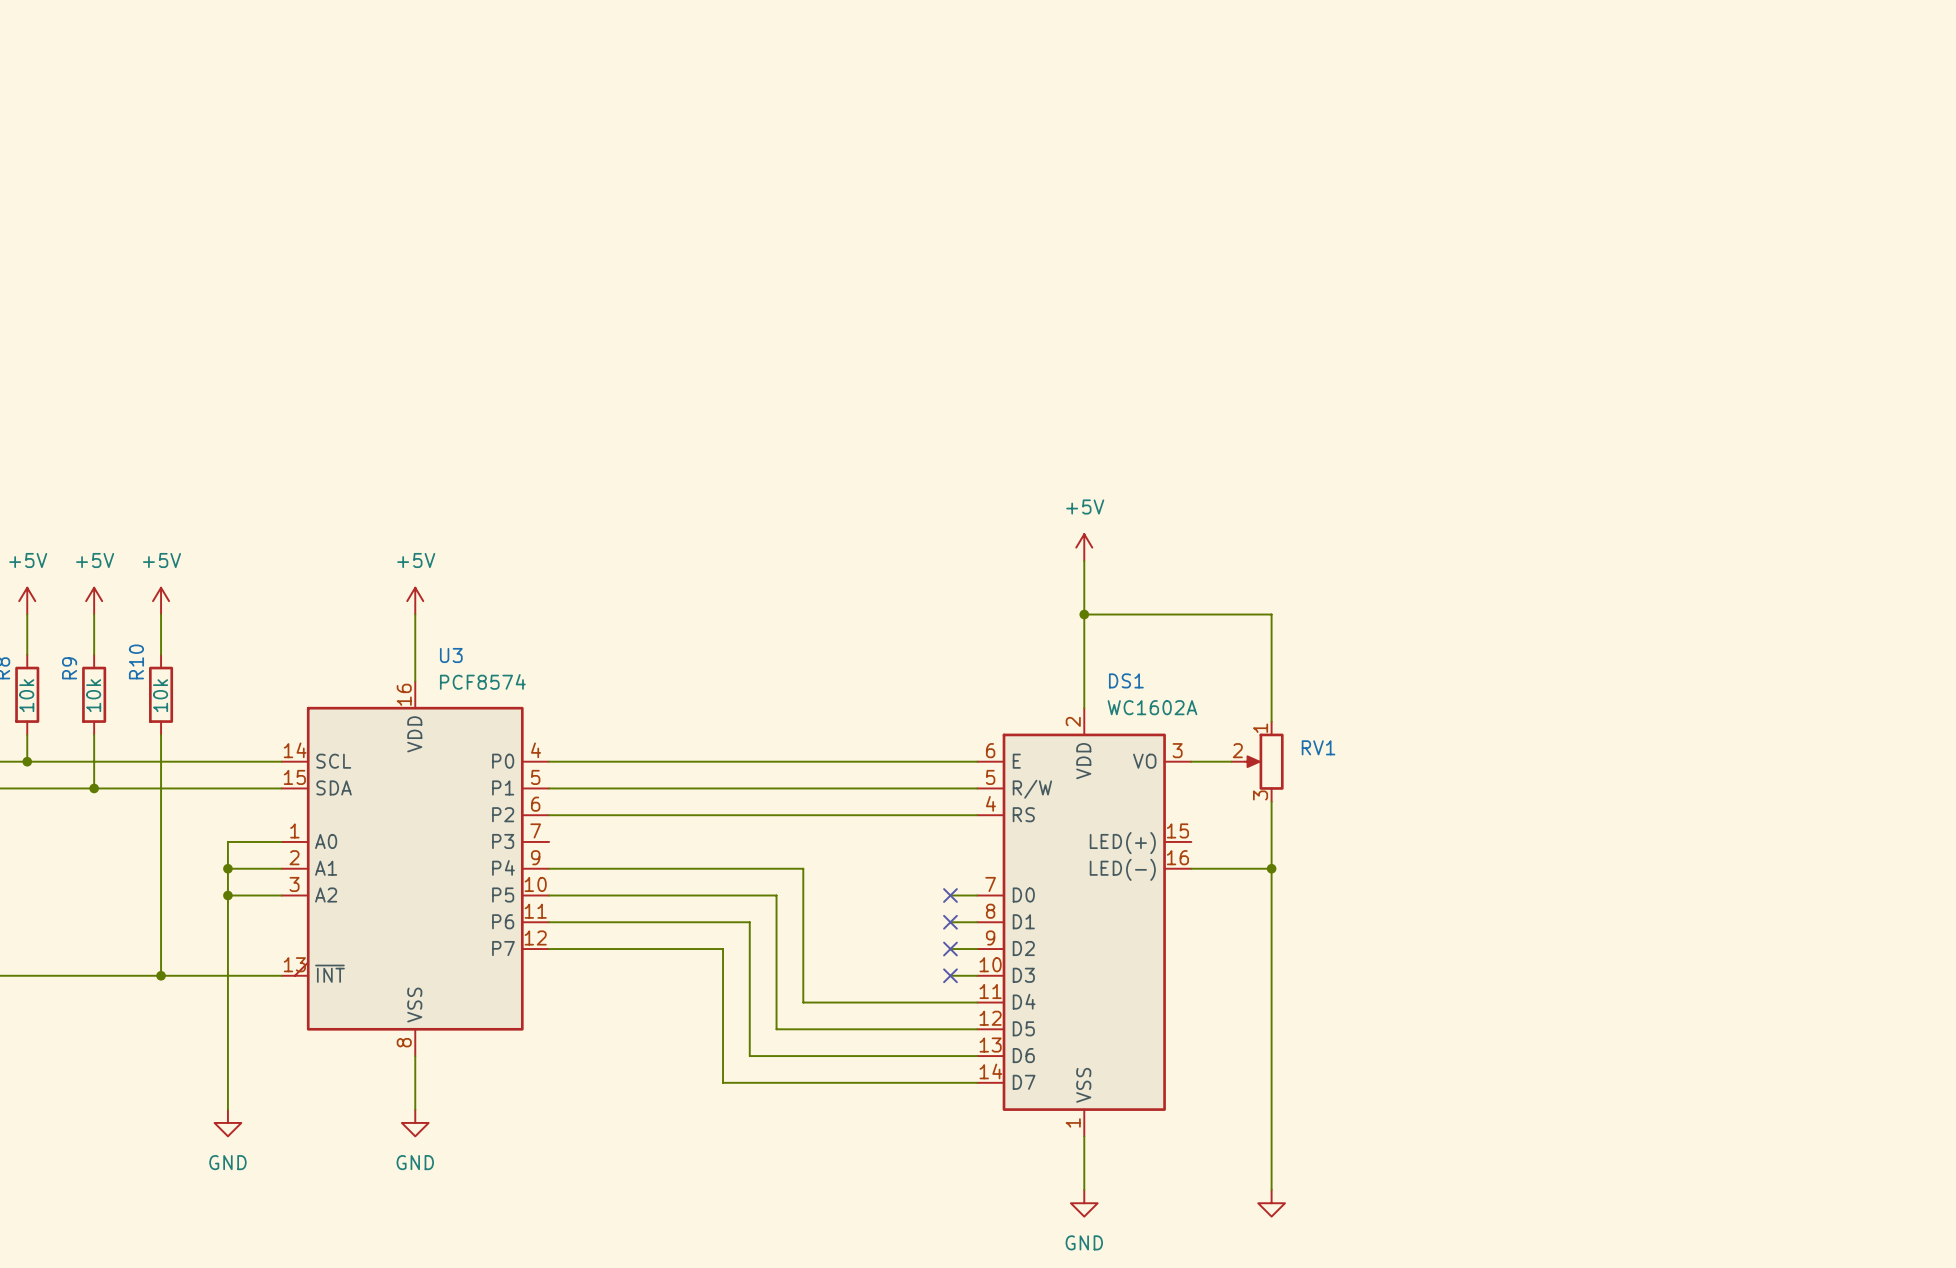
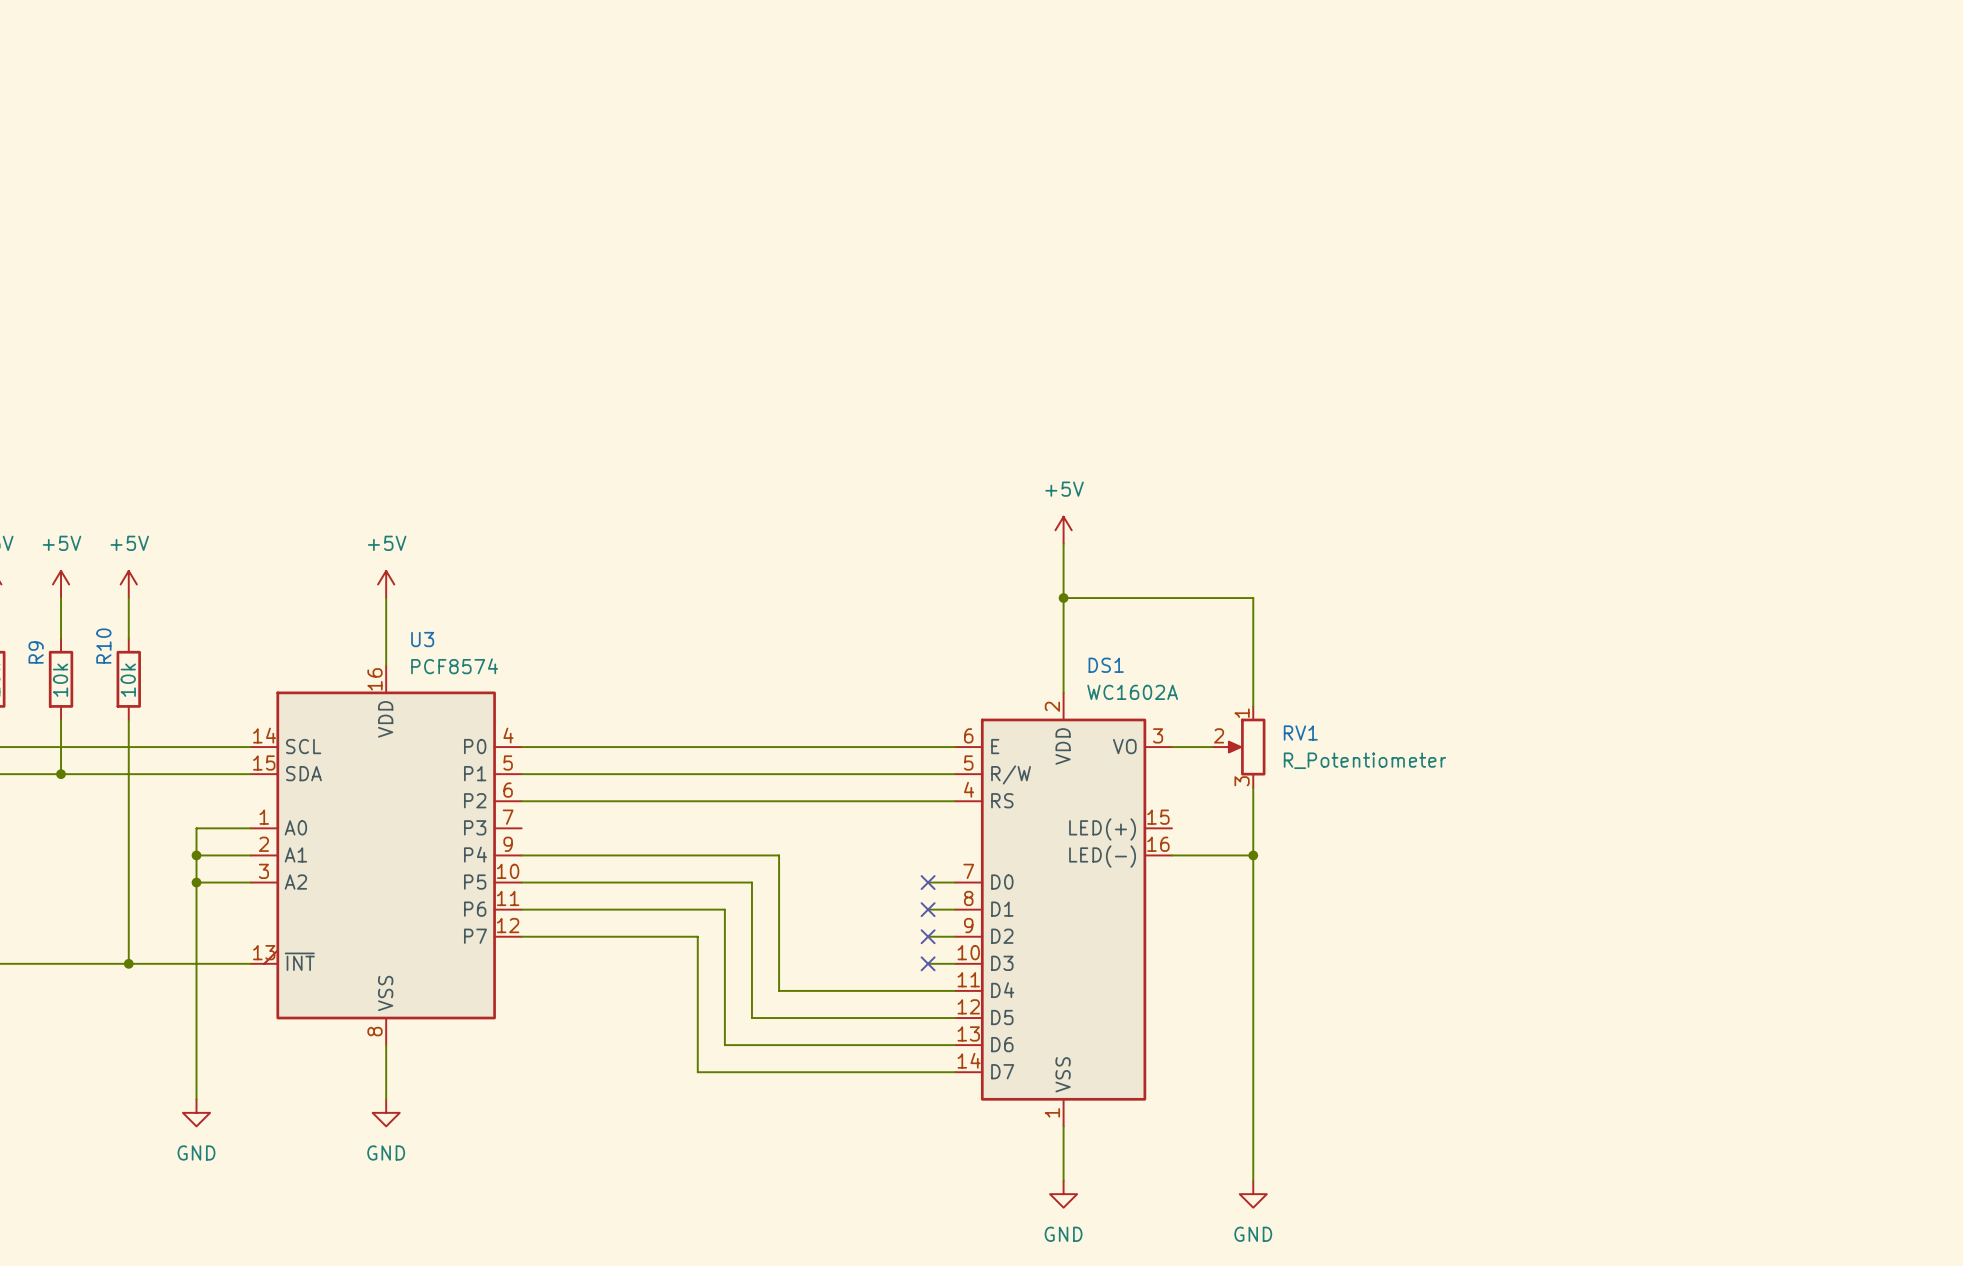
RV1 value: none -> R_Potentiometer (1364, 760)
power symbol text: none -> GND (1253, 1234)

